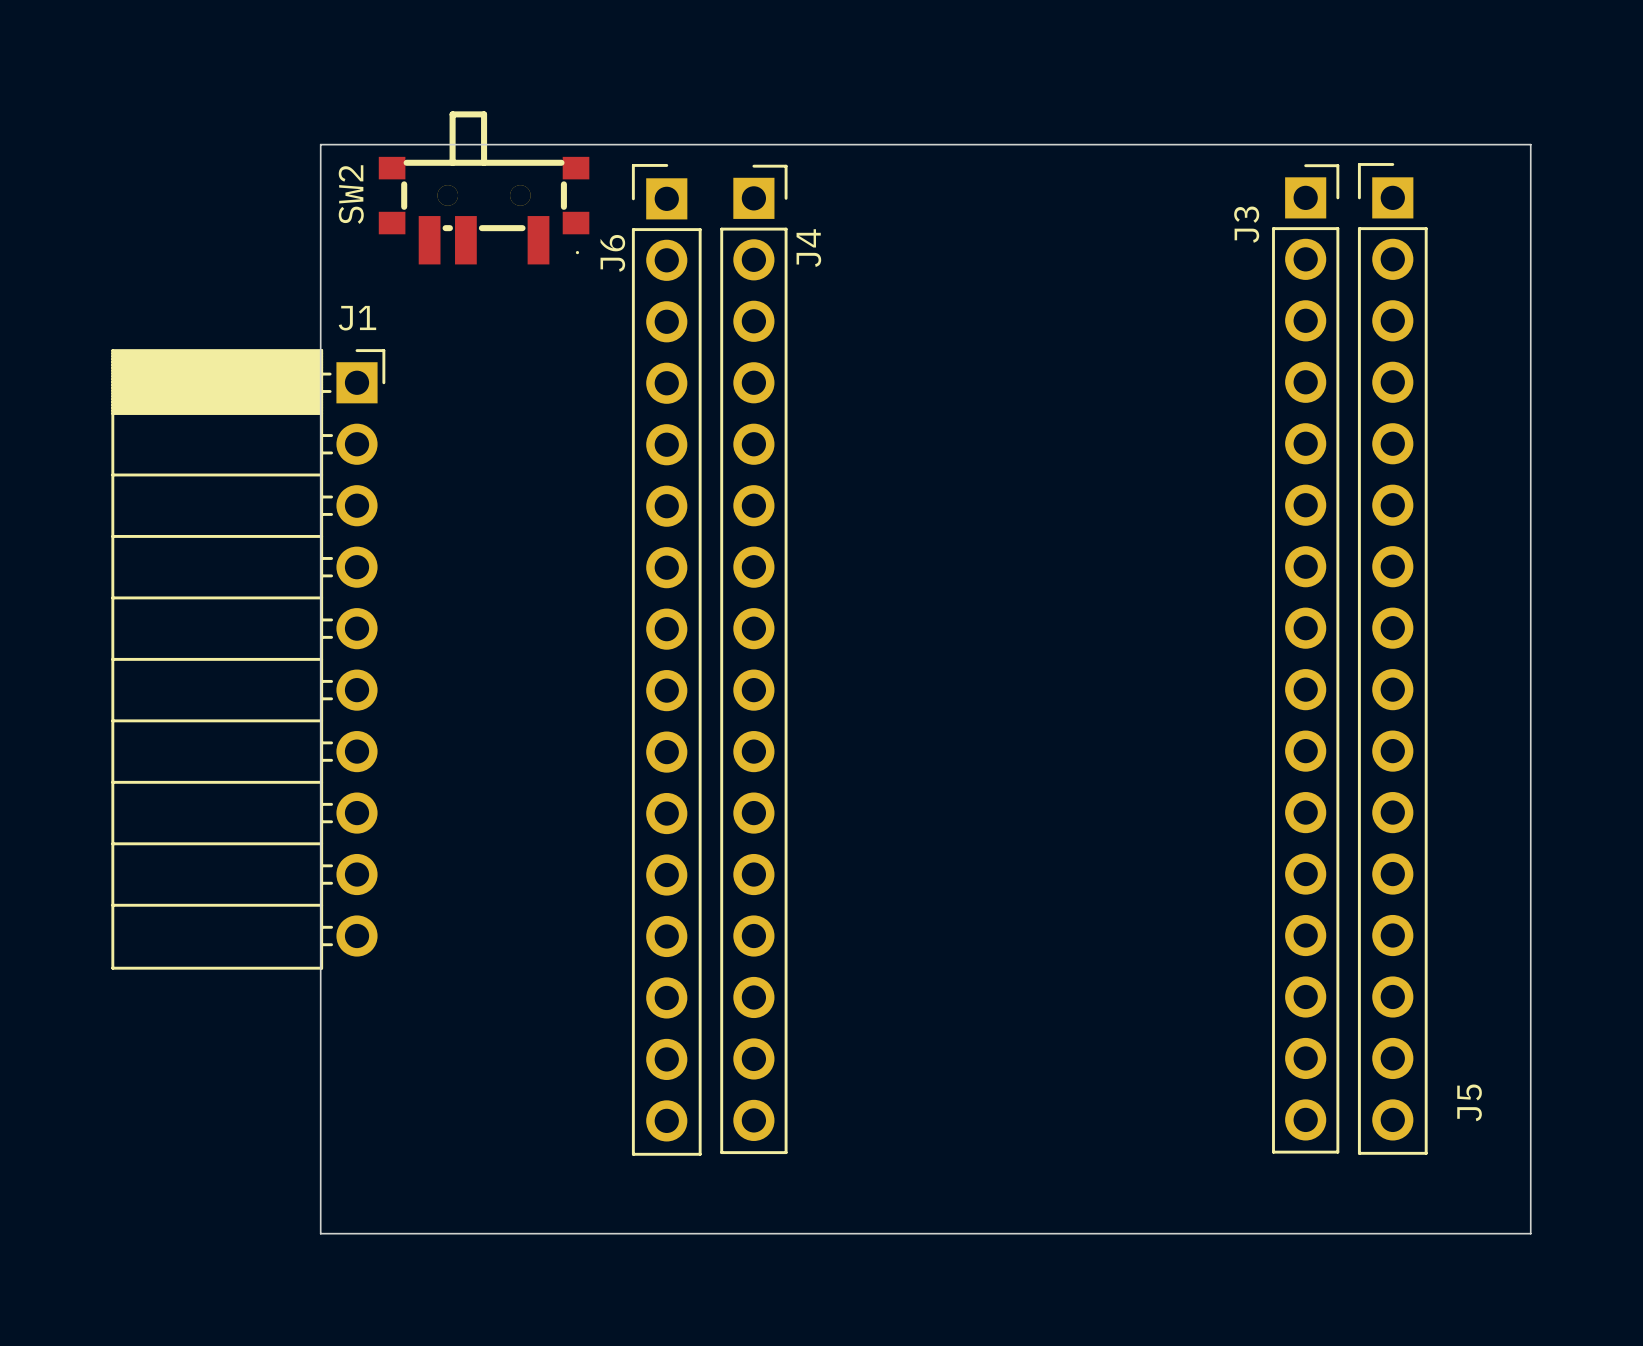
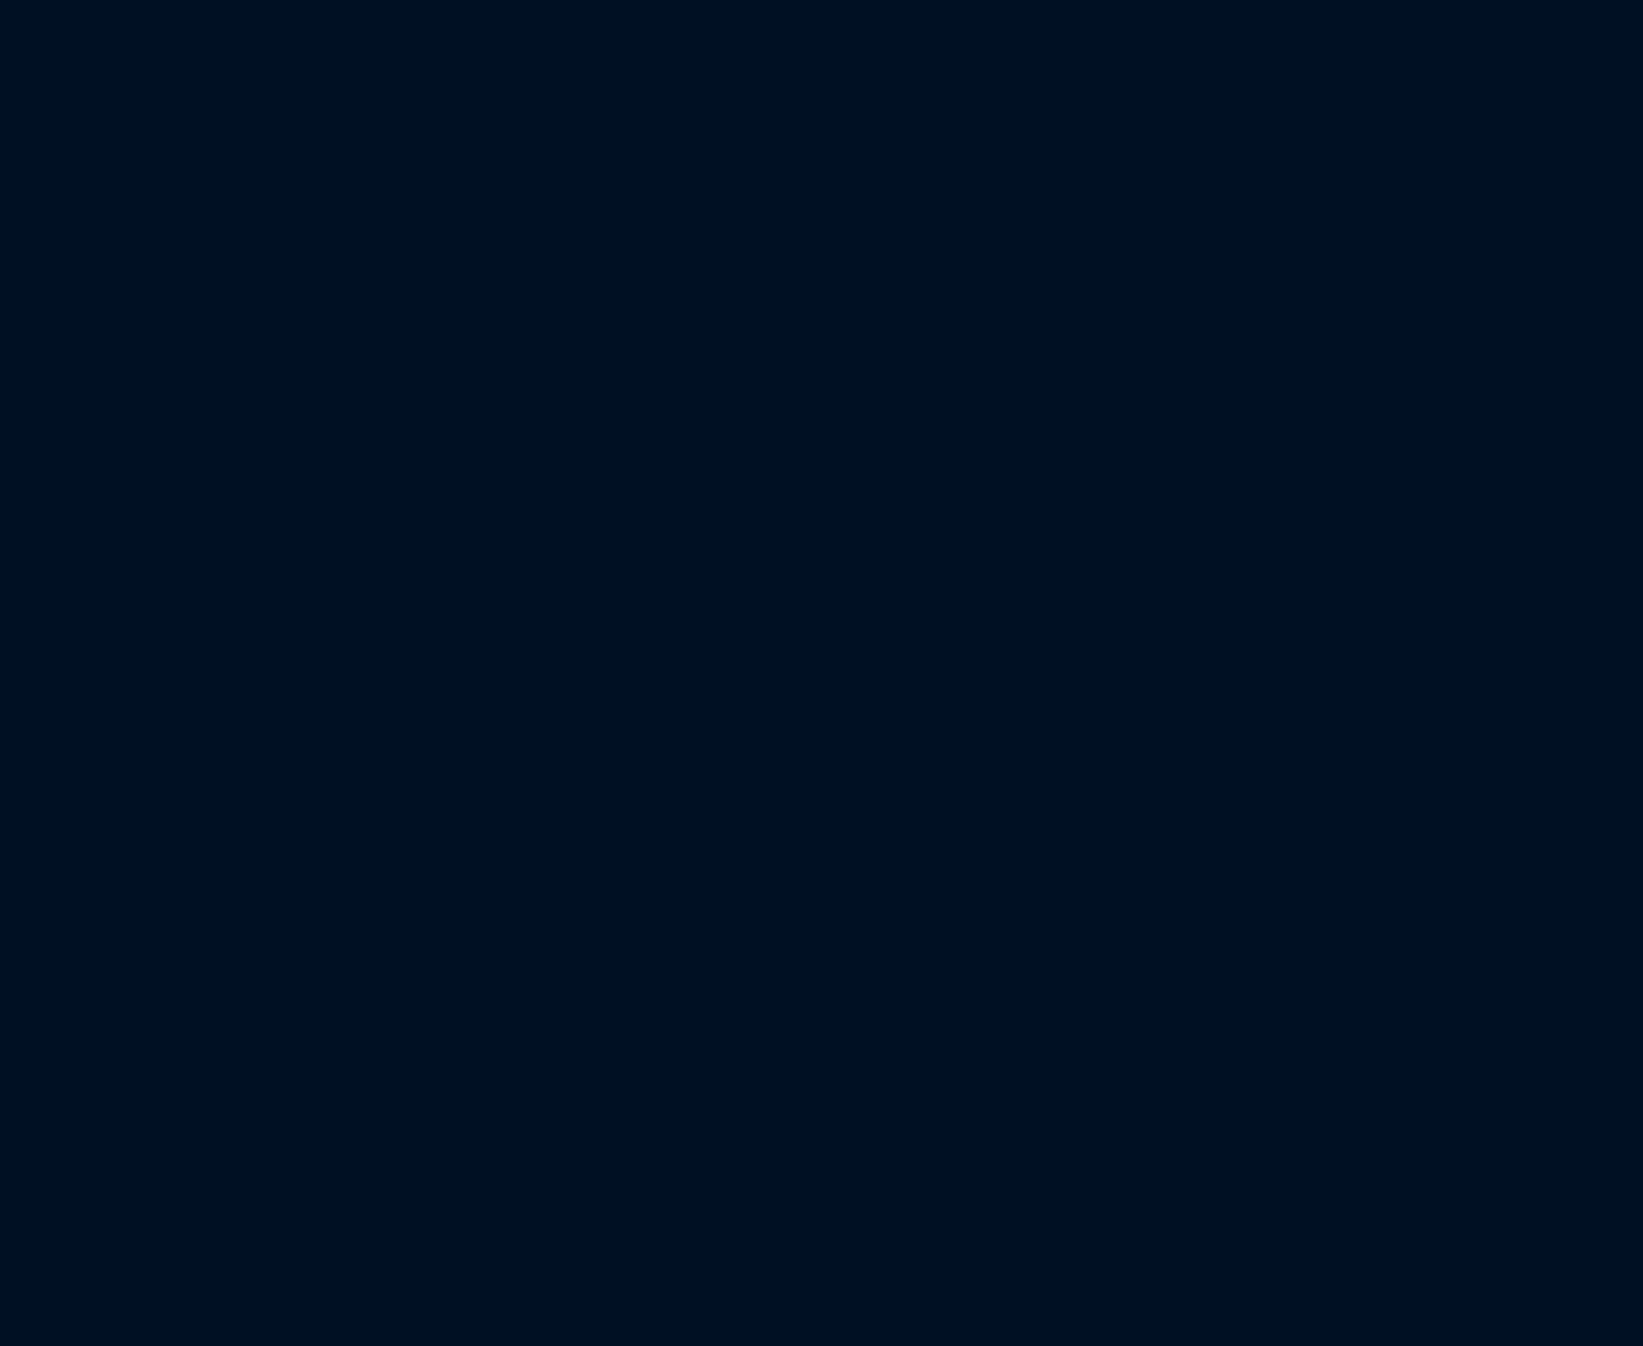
board edge: (320, 144) (1530, 144) (1530, 1233) (320, 1233) (320, 144) -> none
SW2: (484, 187) -> none
J3: (1305, 658) -> none
J5: (1392, 658) -> none
J1: (248, 659) -> none
J6: (666, 659) -> none
J4: (753, 659) -> none

